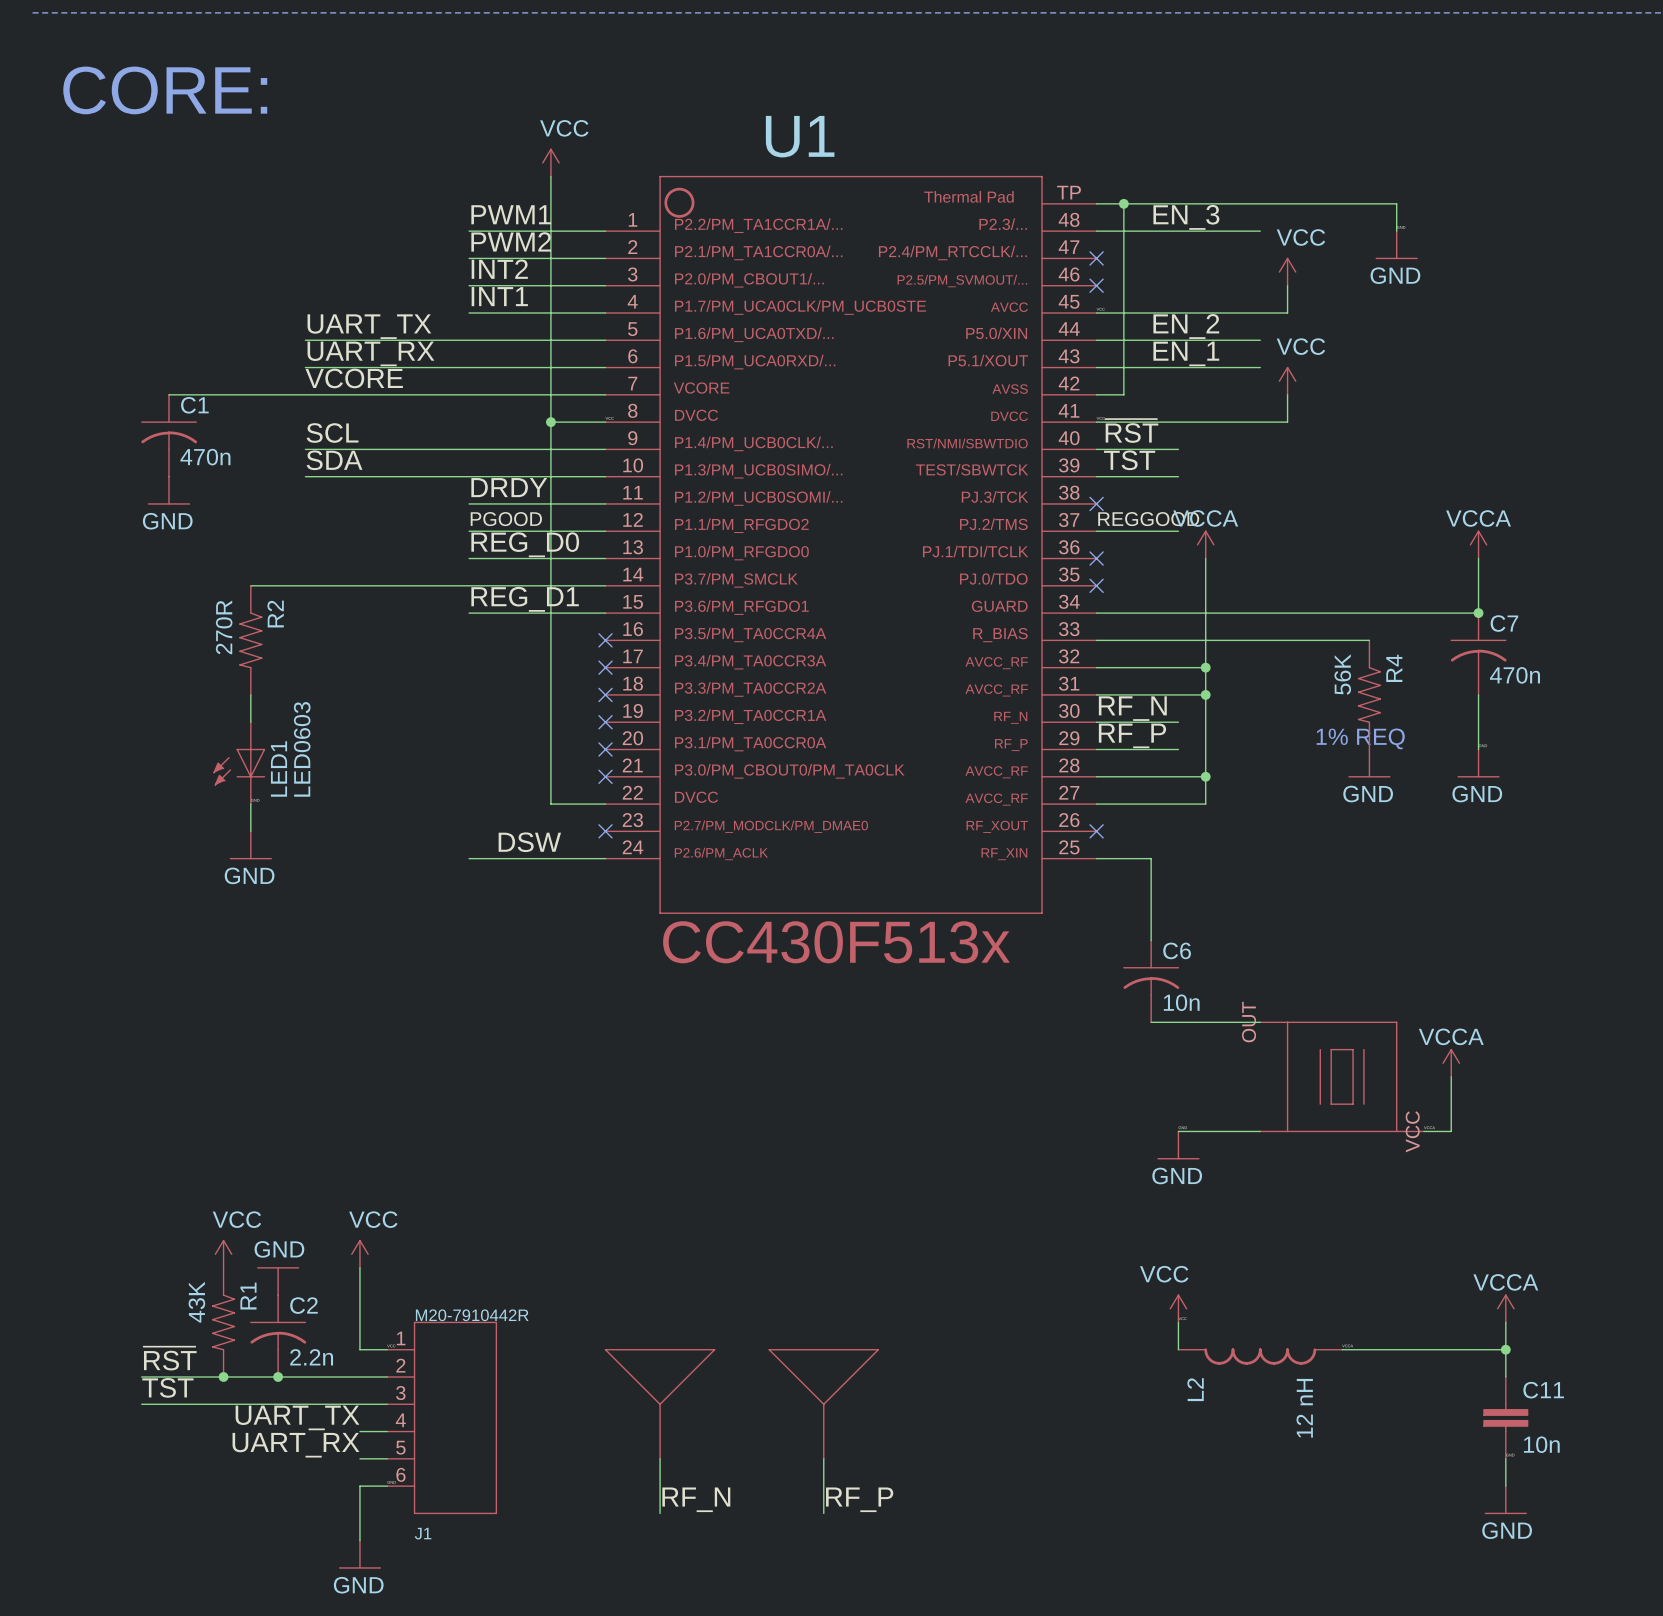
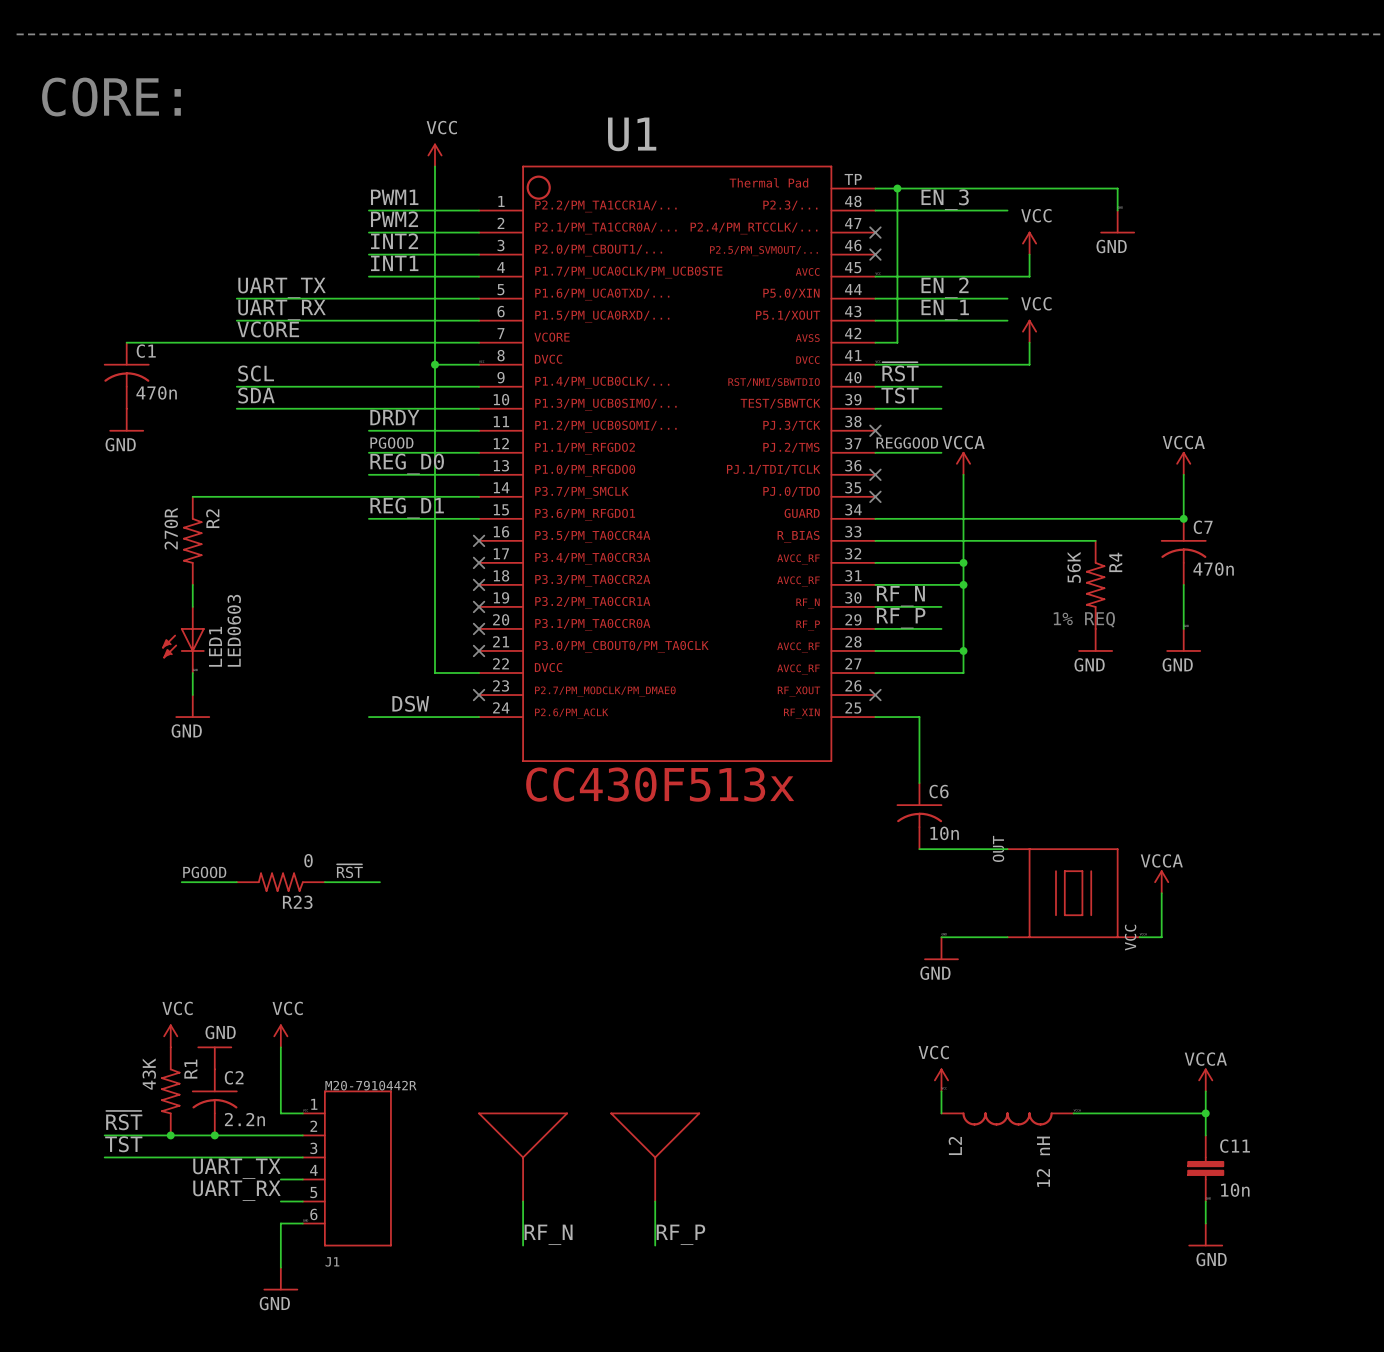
label: none -> ~{RST} (349, 871)
label: none -> PGOOD (204, 872)
wire: none -> (181, 882) (236, 882)
R23: none -> 0 (280, 882)
wire: none -> (324, 882) (379, 882)

